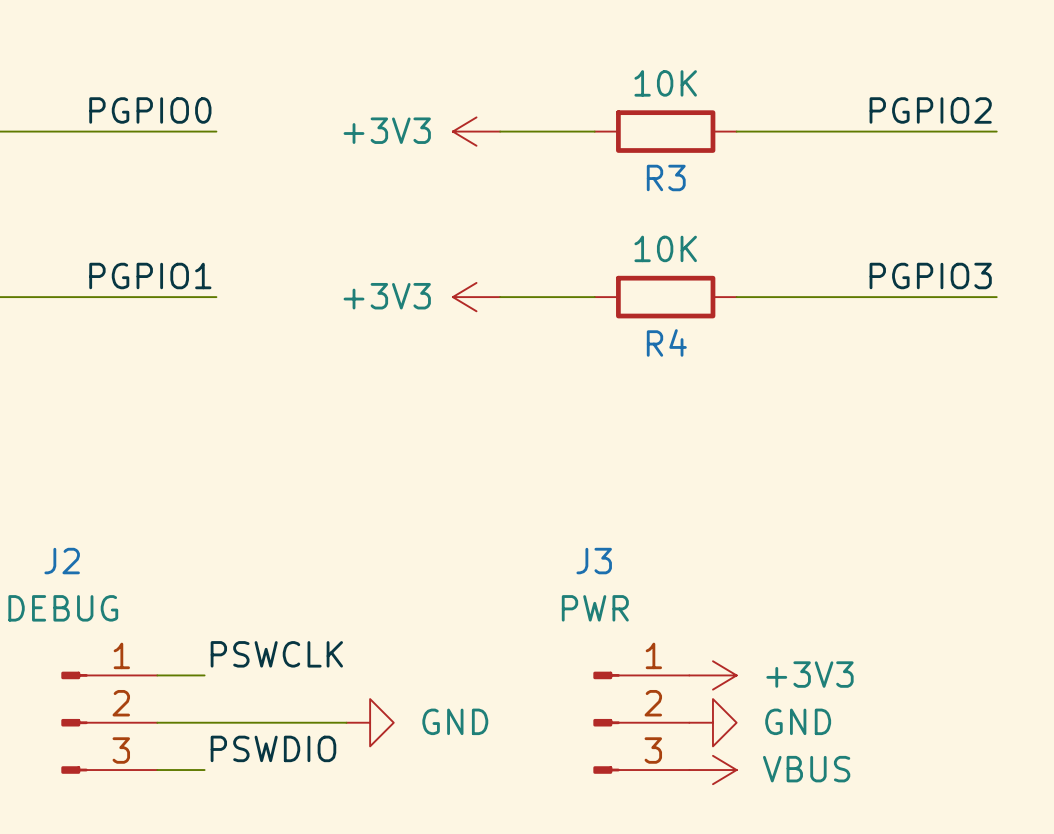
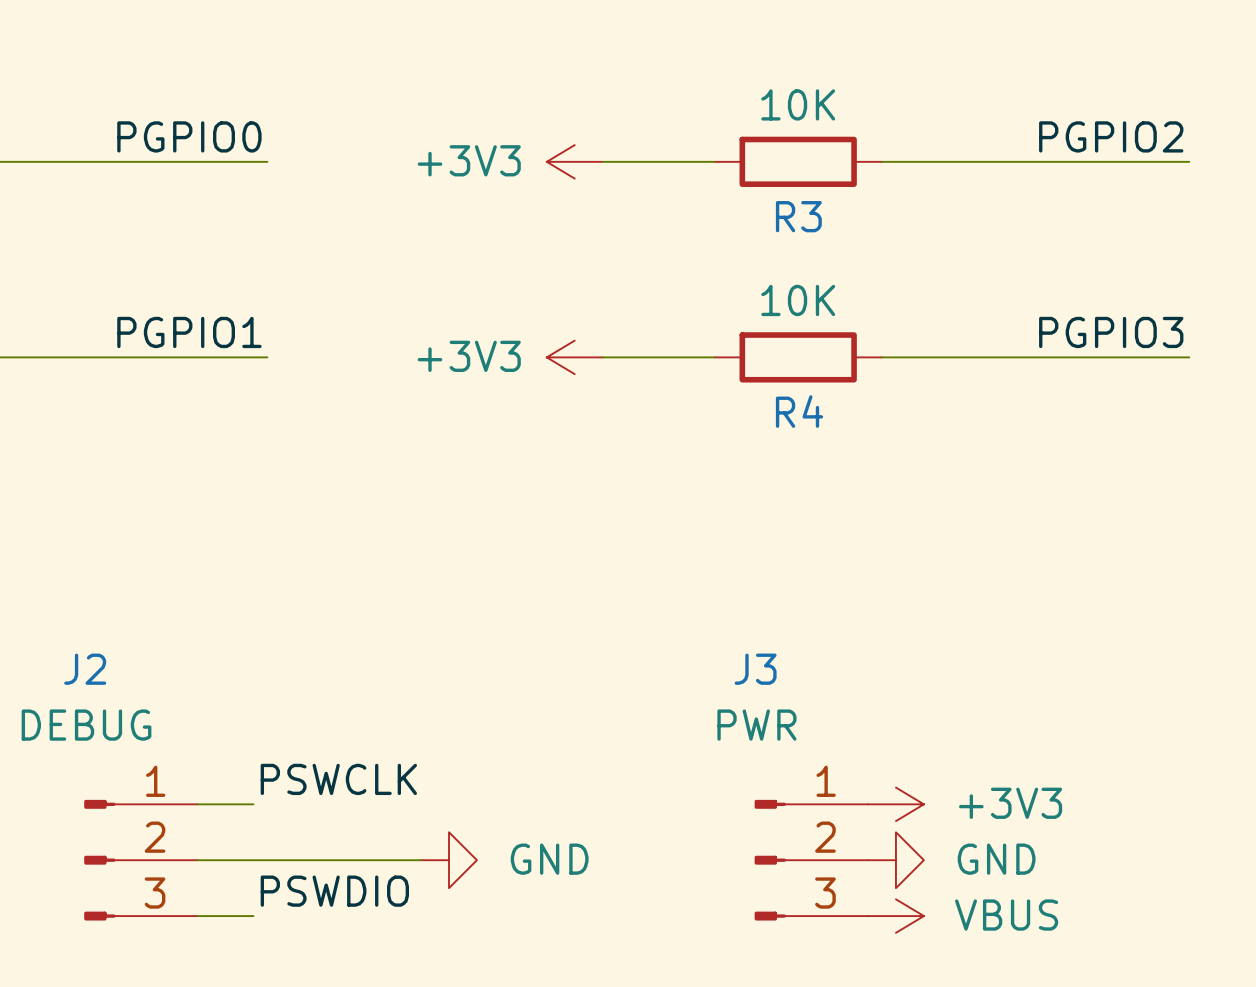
power symbol position: +3V3 (712, 675) -> +3V3 (895, 804)
J3 position: (641, 722) -> (811, 860)
power symbol position: GND (712, 722) -> GND (895, 860)
power symbol position: VBUS (712, 770) -> VBUS (895, 916)

